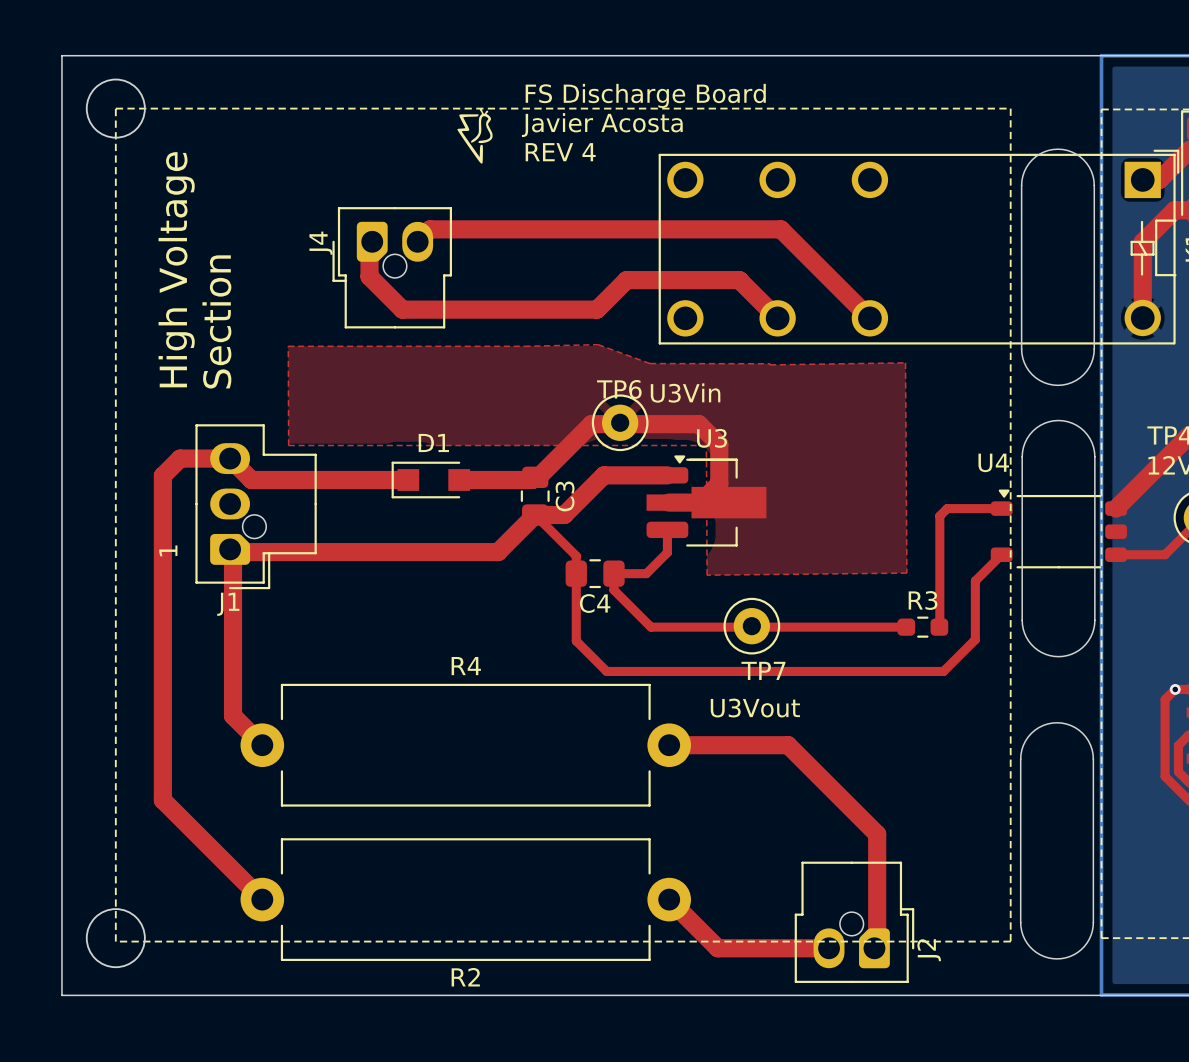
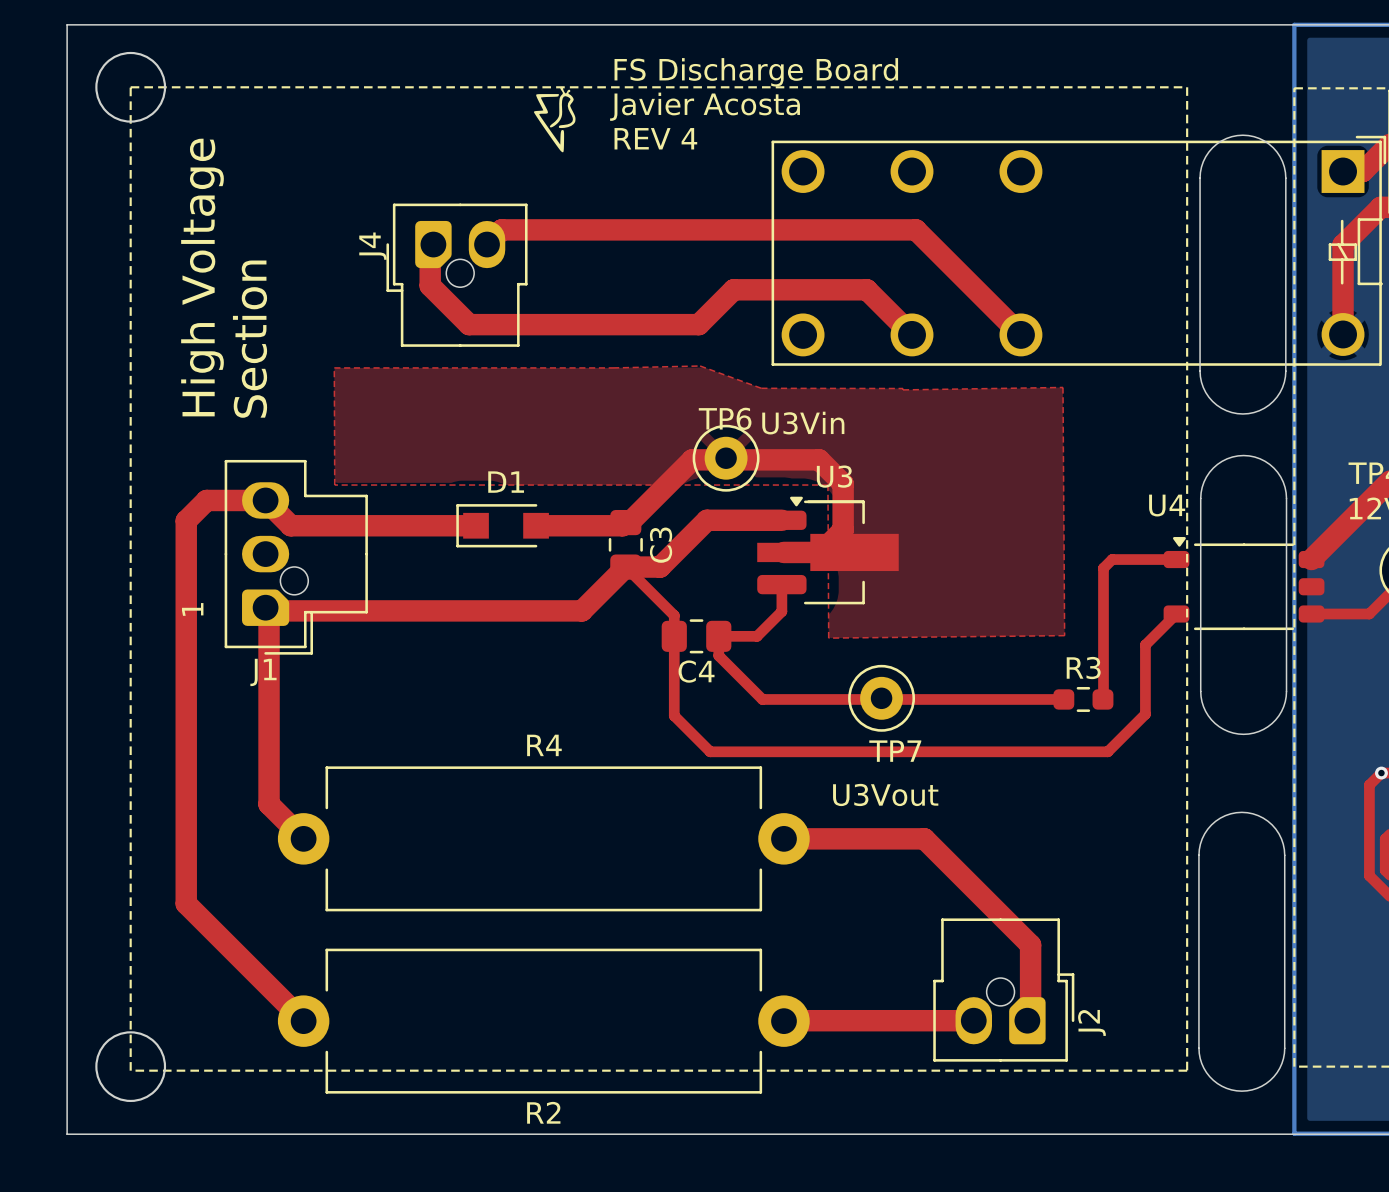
top track: (877, 834) (877, 945) -> (1029, 943) (1030, 1017) (1027, 1020)
top track: (669, 899) (717, 948) (829, 948) -> (783, 1021) (973, 1020)
J2 position: (854, 922) -> (1003, 990)

